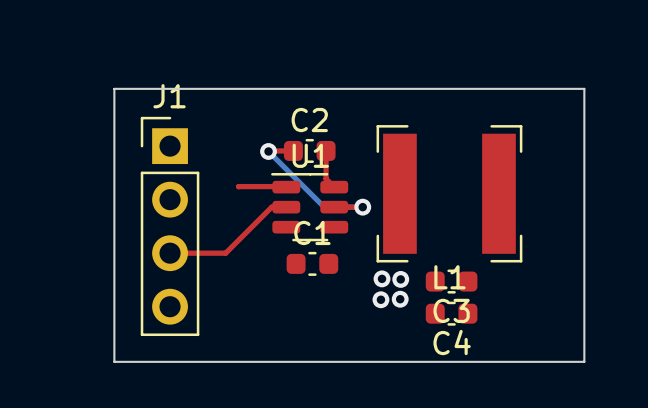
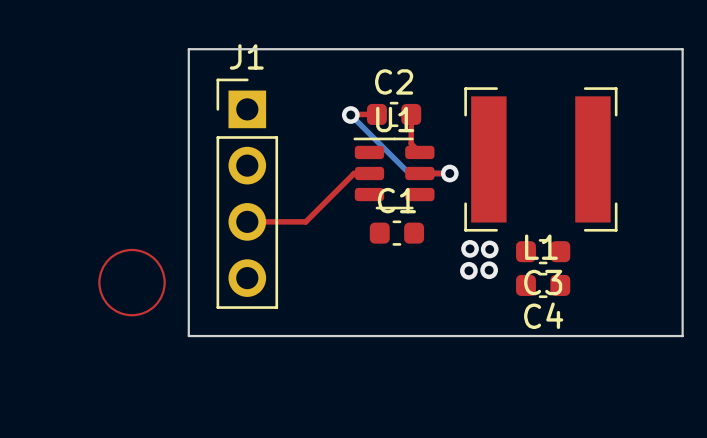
top track: (238, 186) (285, 186) -> none
drawing: none -> [98, 248, 166, 317]

